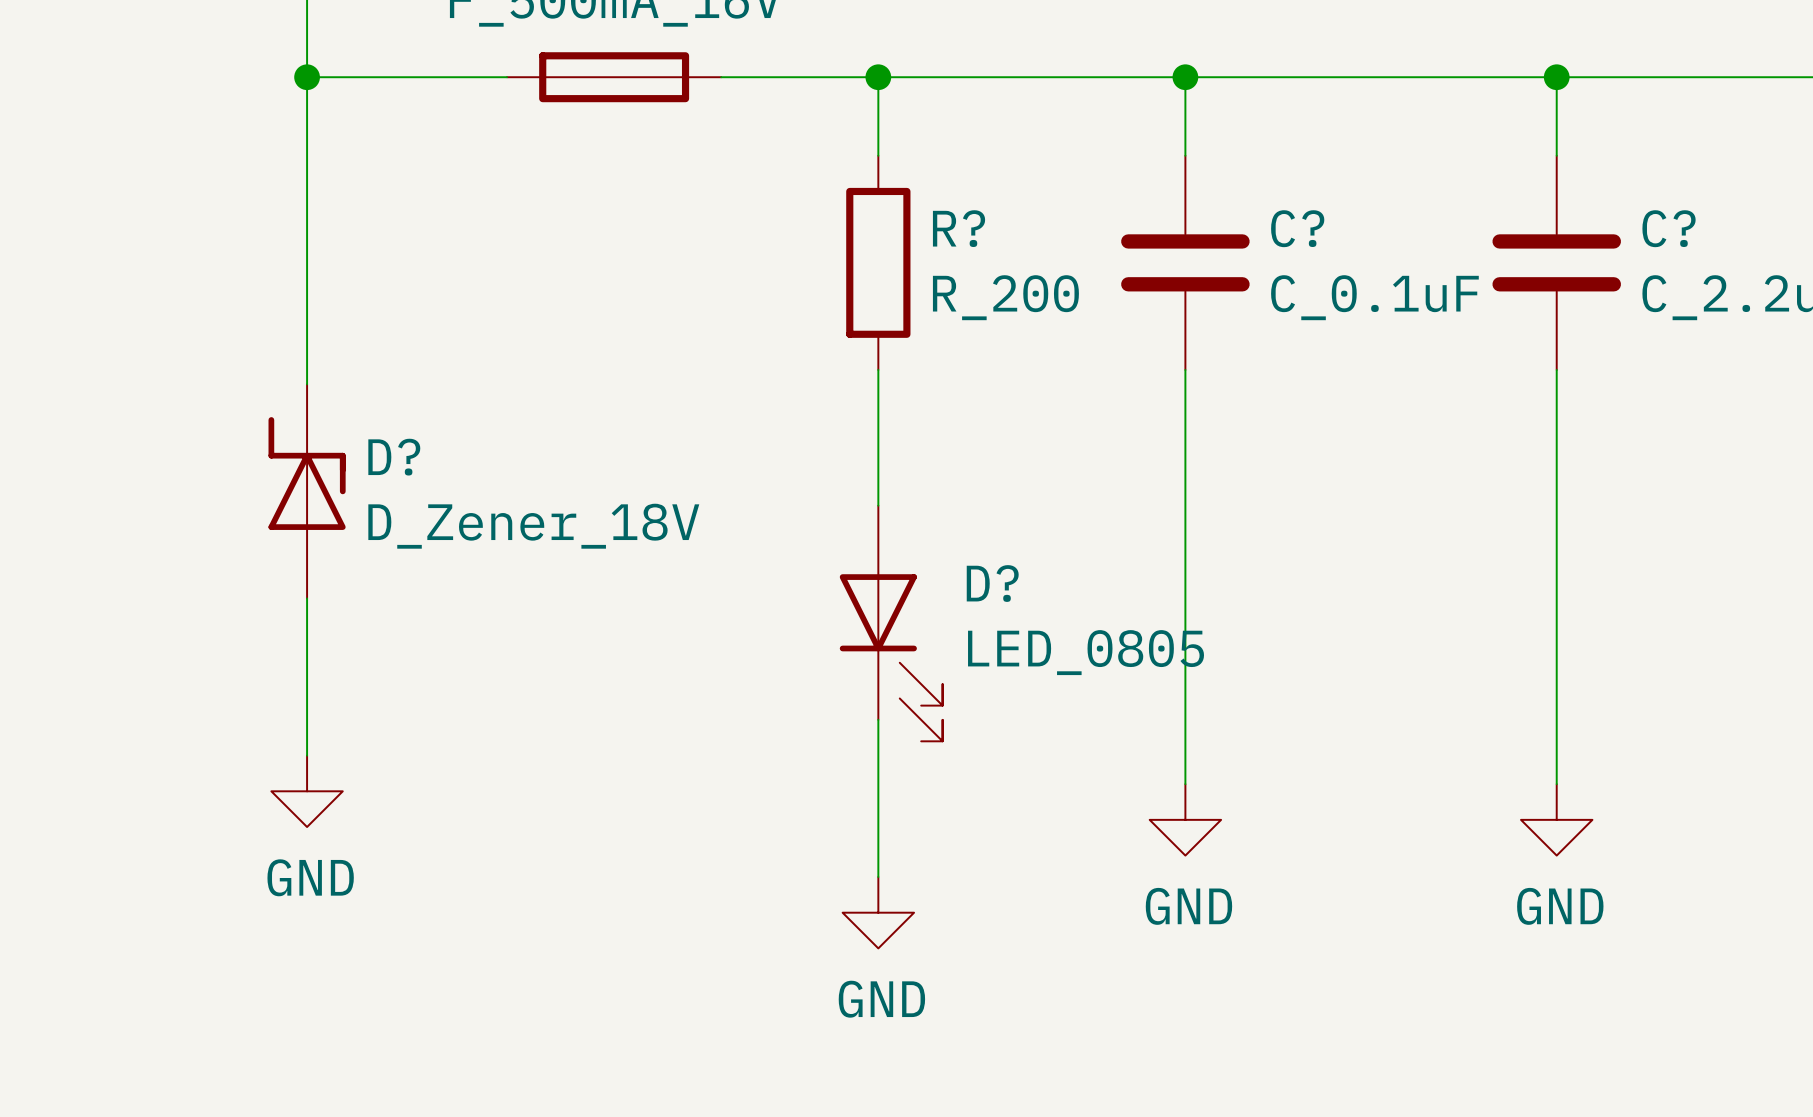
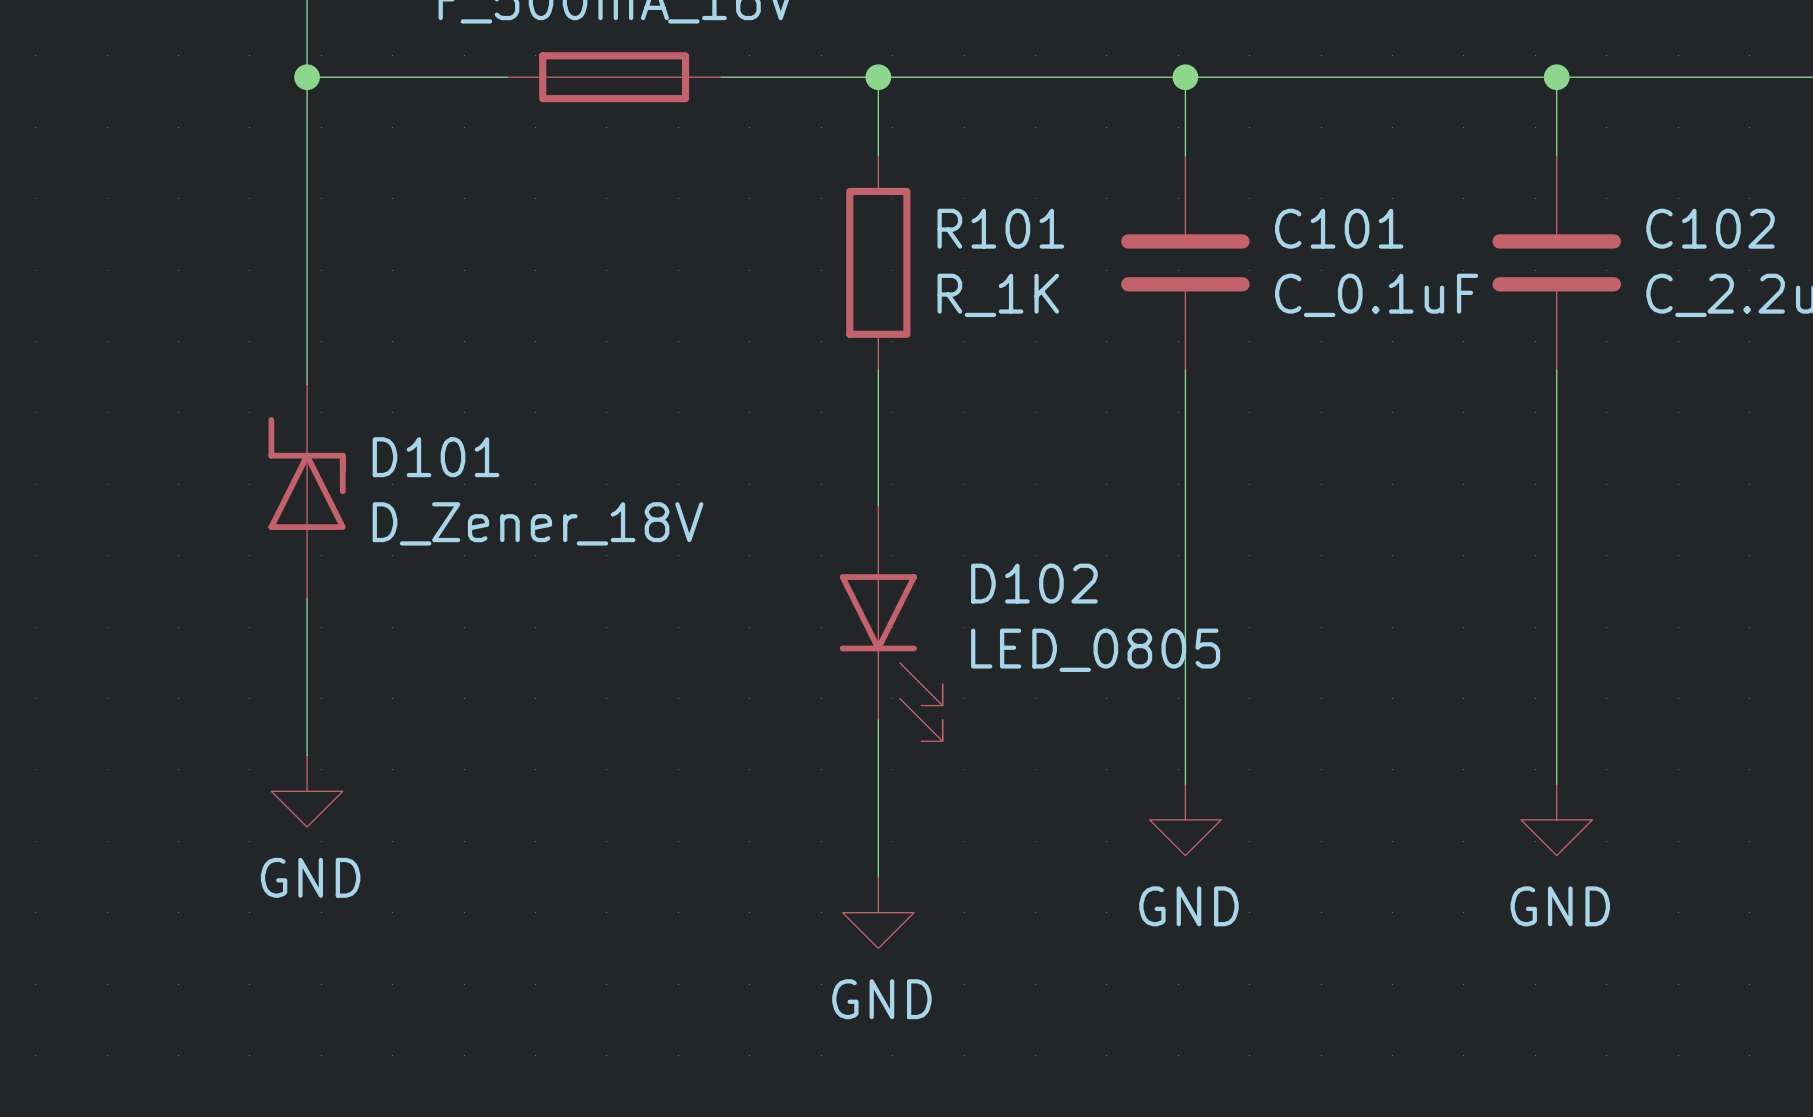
R? name: R? (959, 228) -> R101 (1000, 228)
C? name: C? (1297, 228) -> C101 (1339, 228)
C? name: C? (1669, 228) -> C102 (1710, 228)
R? value: R_200 (1005, 297) -> R_1K (998, 295)
D? name: D? (394, 457) -> D101 (436, 457)
D? name: D? (992, 583) -> D102 (1034, 583)

